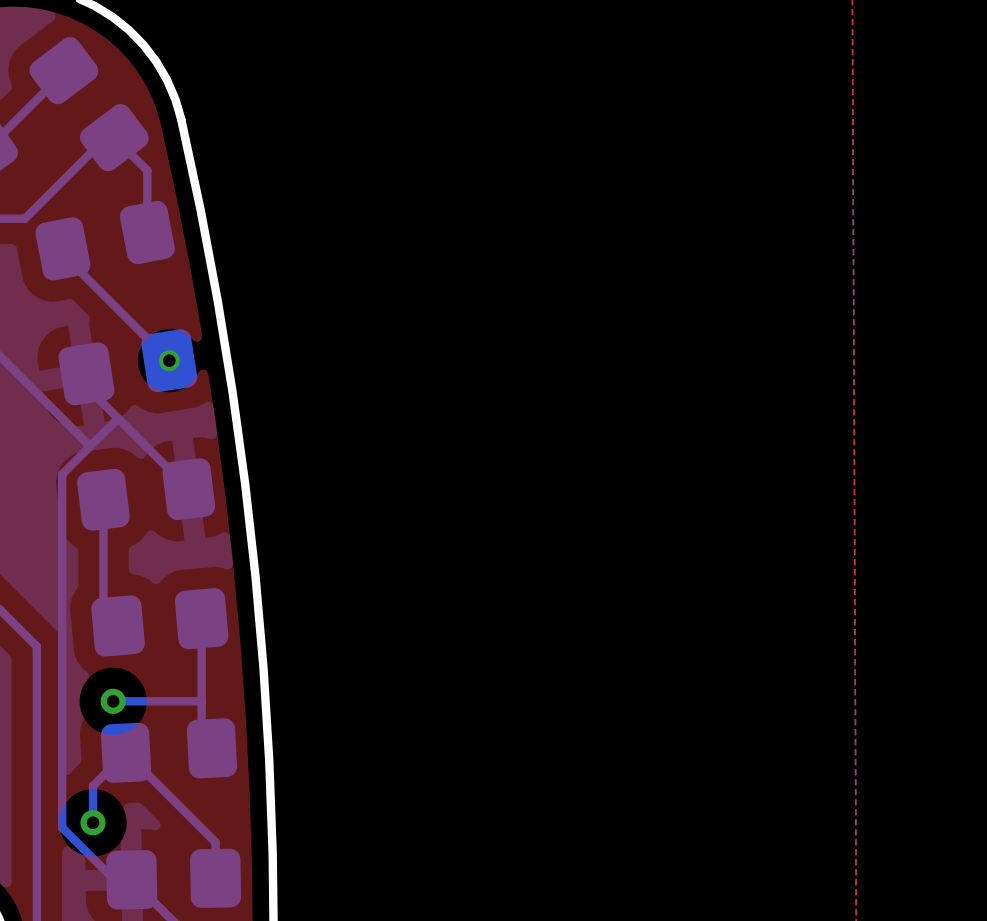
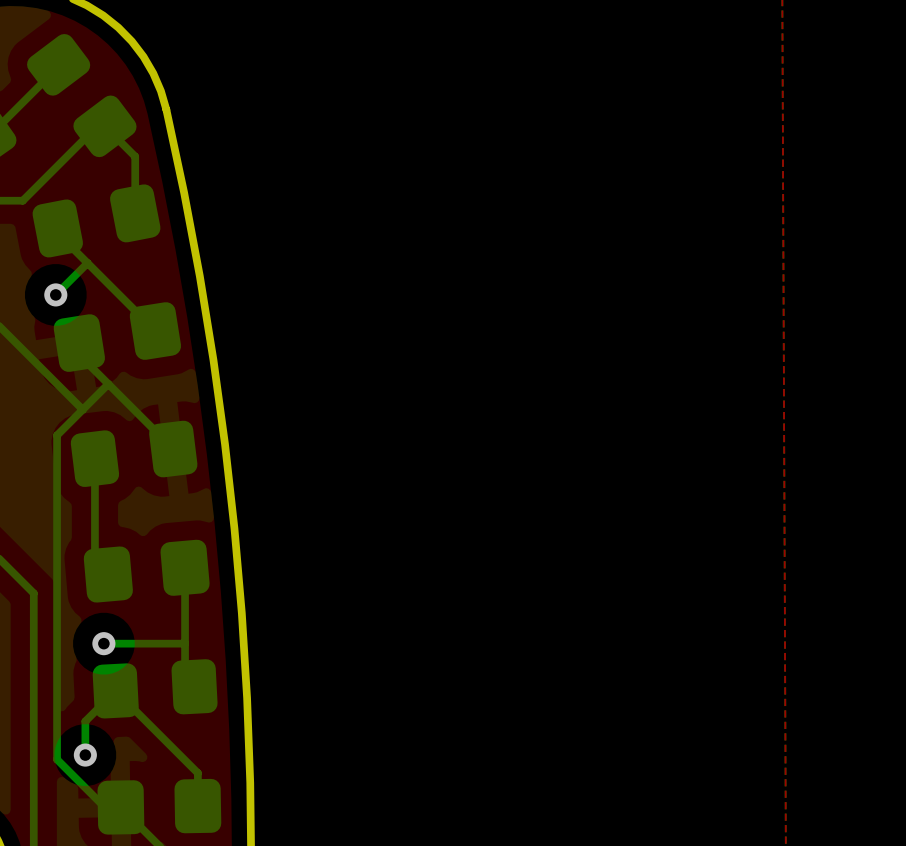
bottom track: none -> (87, 263) (55, 294)
via: none -> (55, 294)
via: (169, 360) -> none

